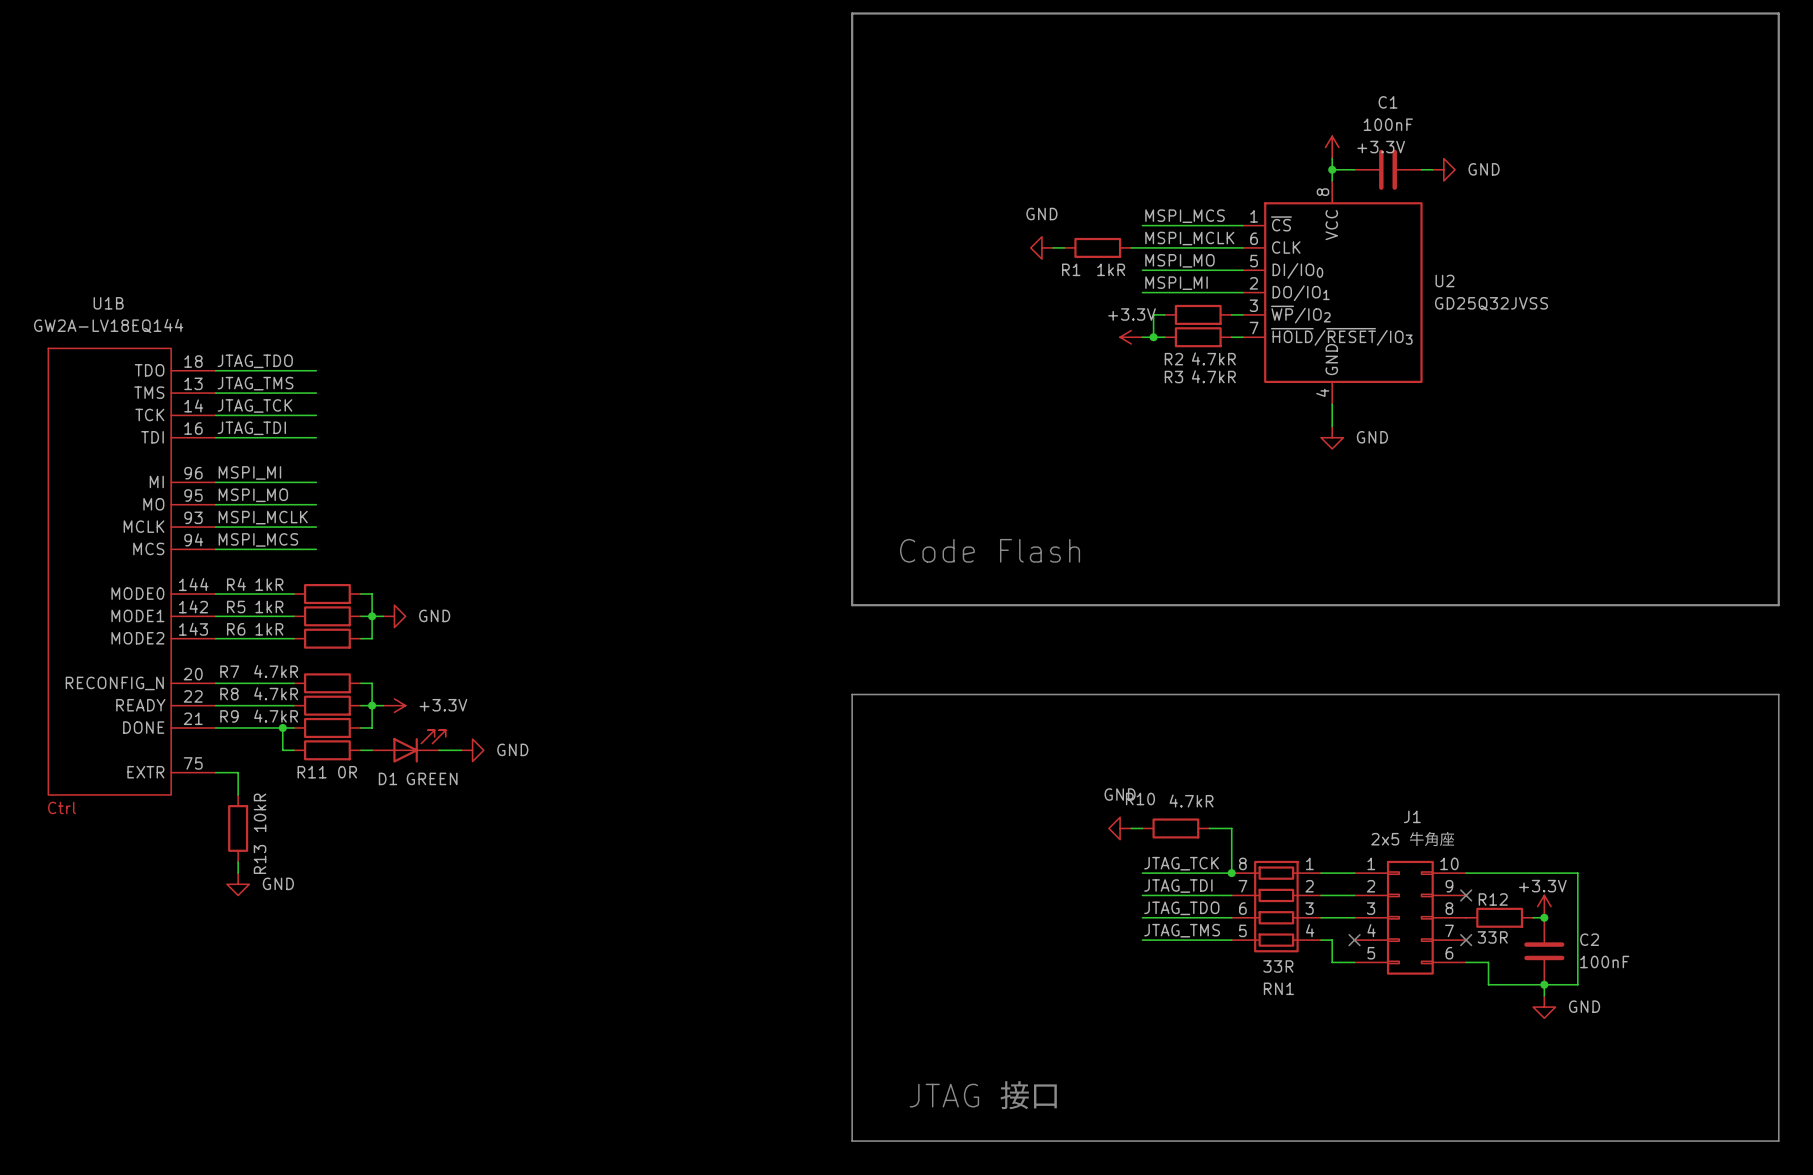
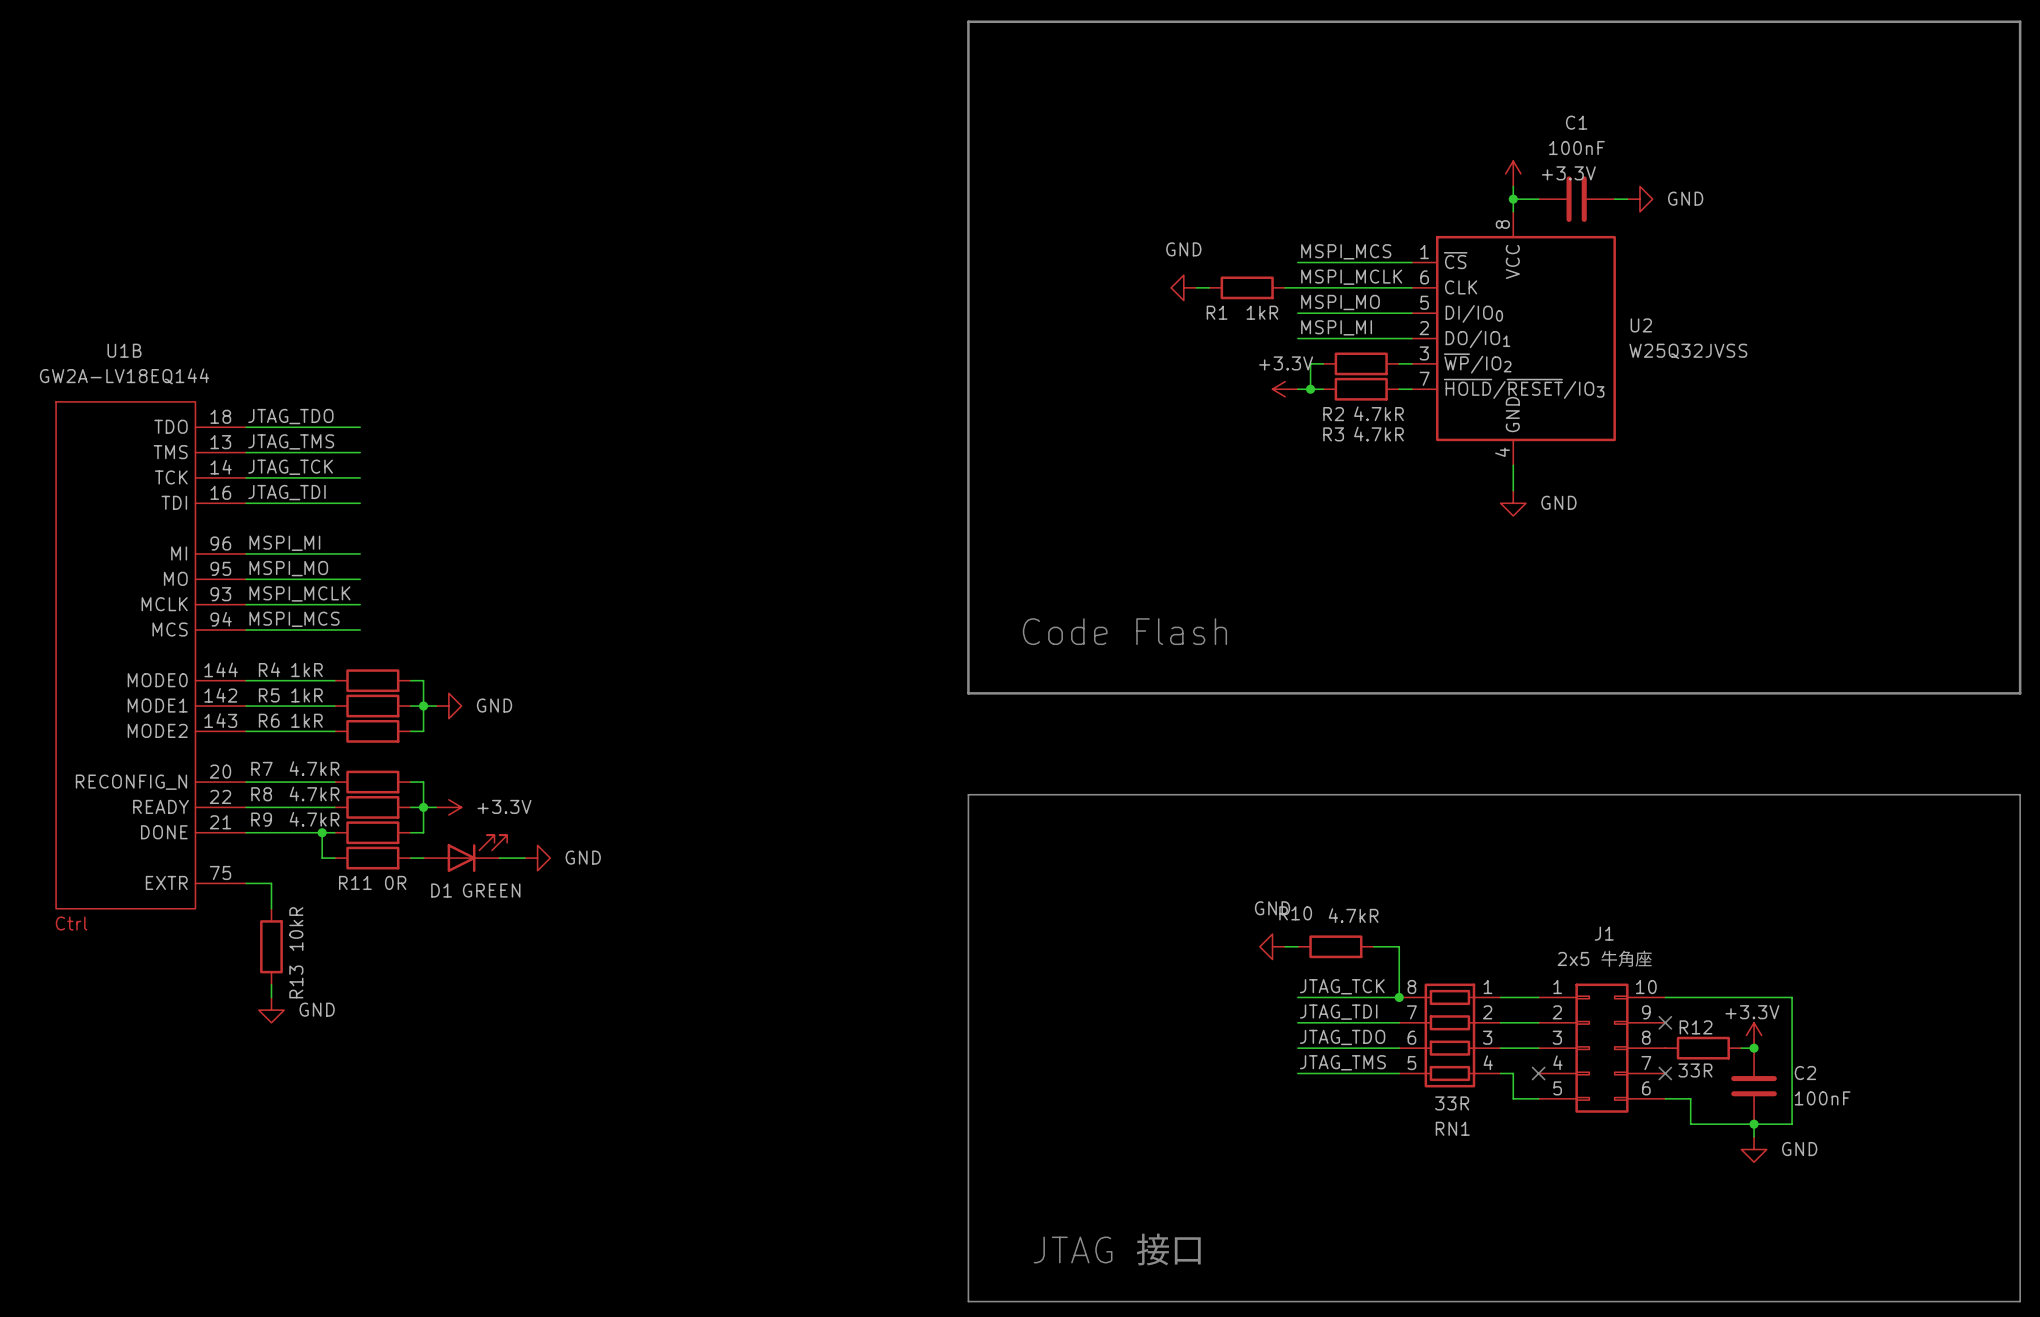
U2 value: GD25Q32JVSS (1491, 303) -> W25Q32JVSS (1688, 351)

